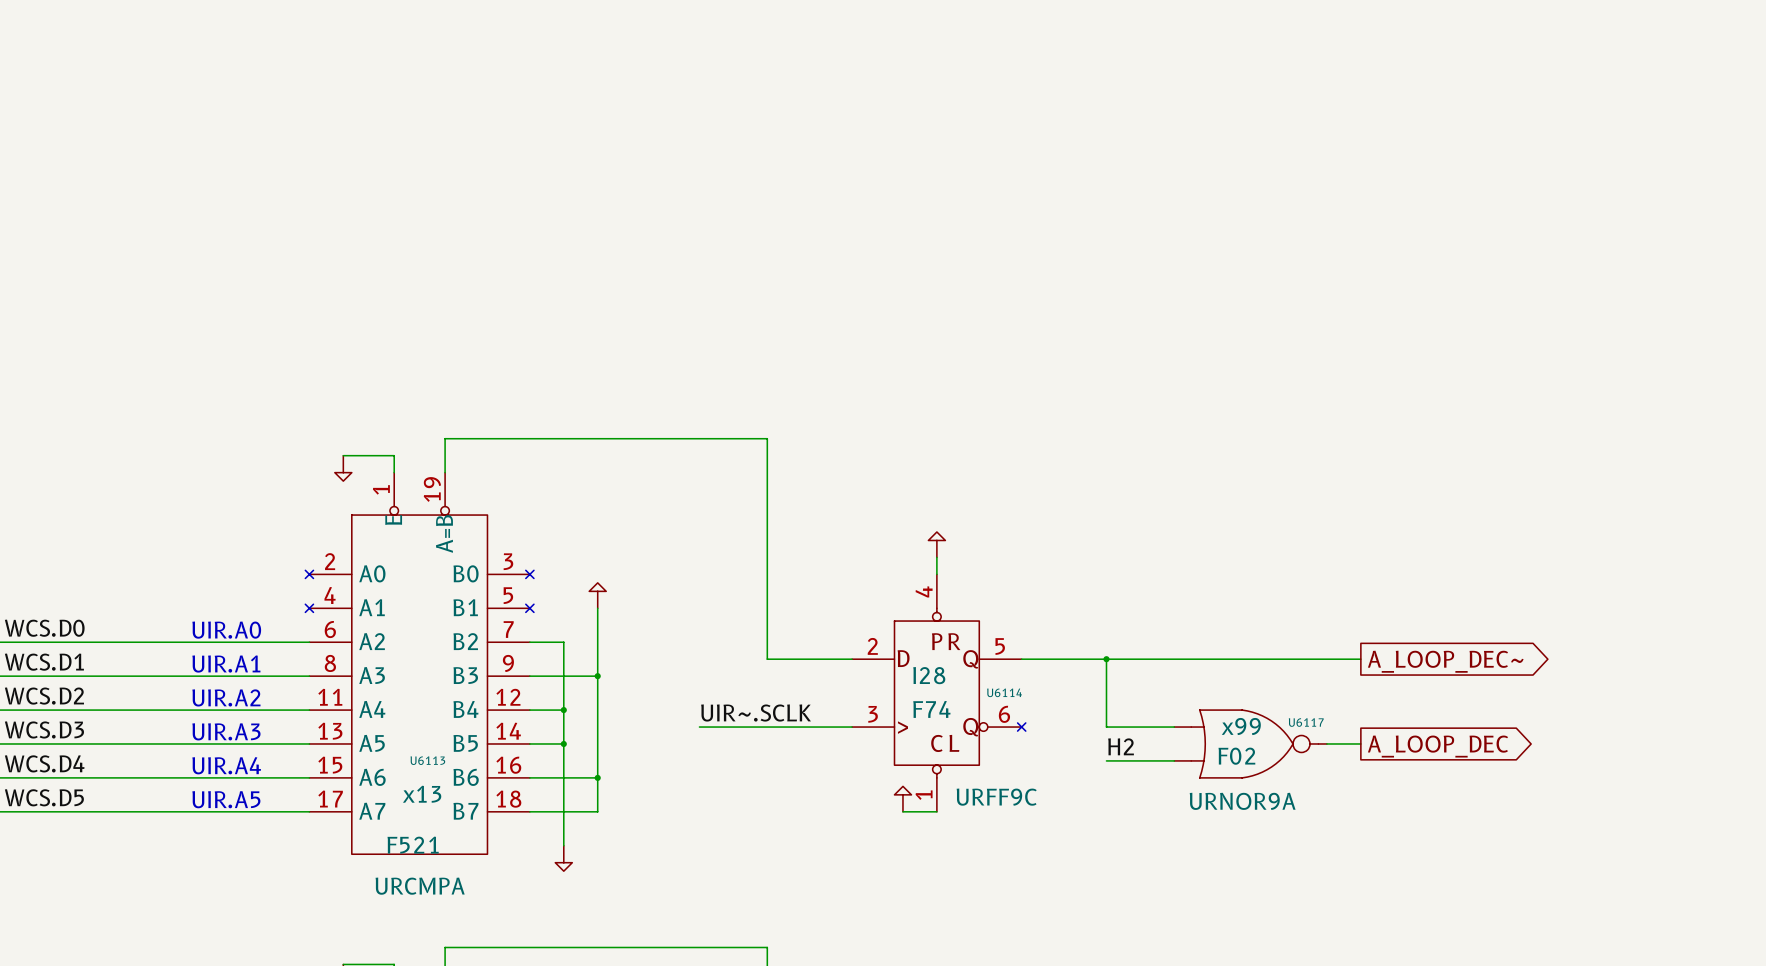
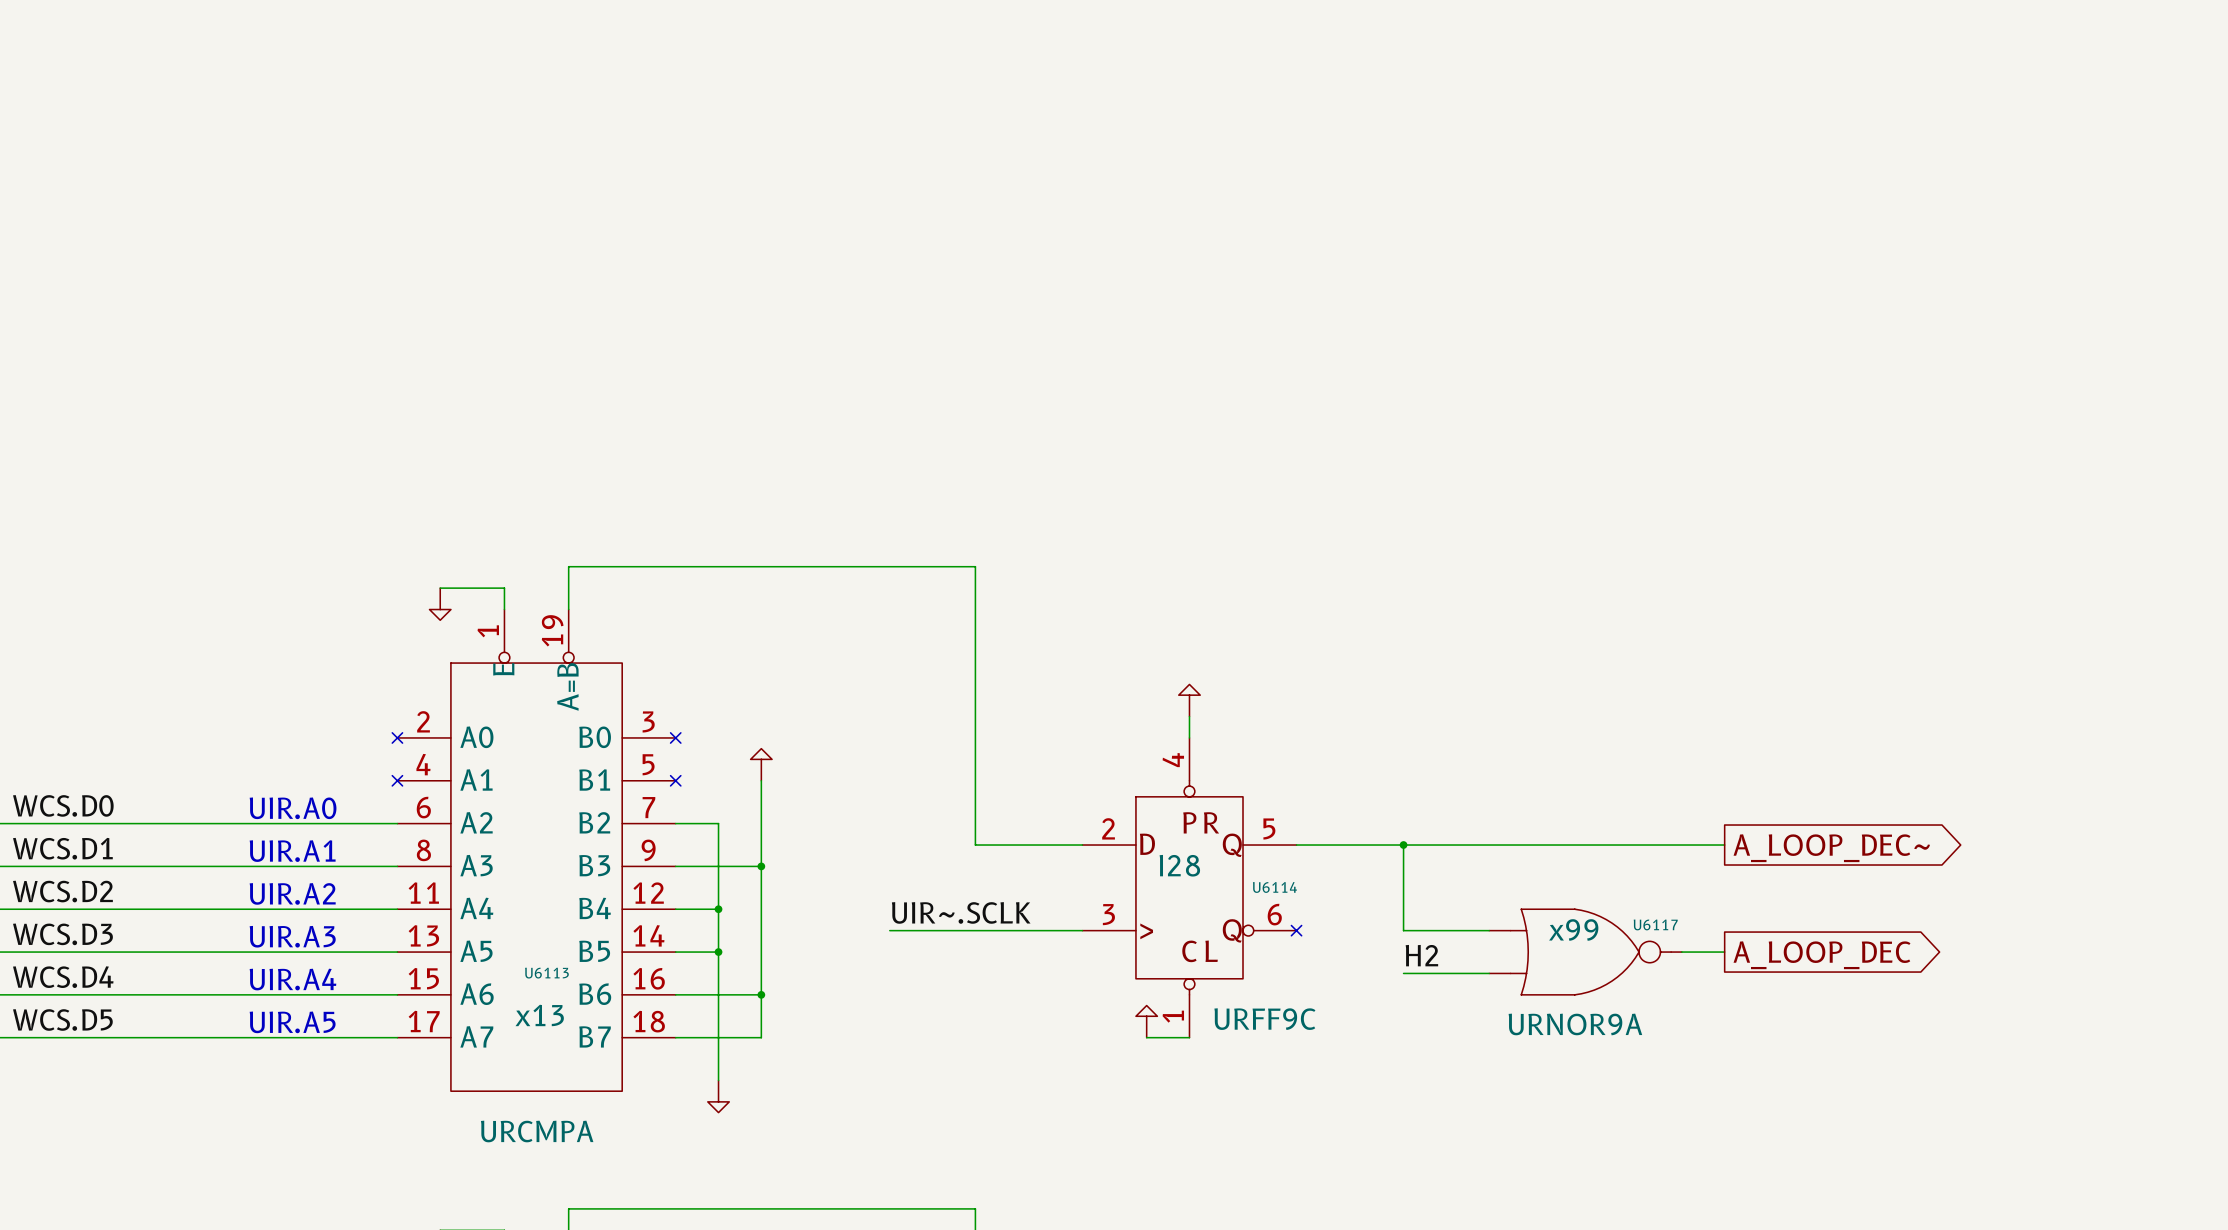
U6114 value: F74 (931, 709) -> none
U6117 value: F02 (1236, 756) -> none
U6113 value: F521 (413, 845) -> none

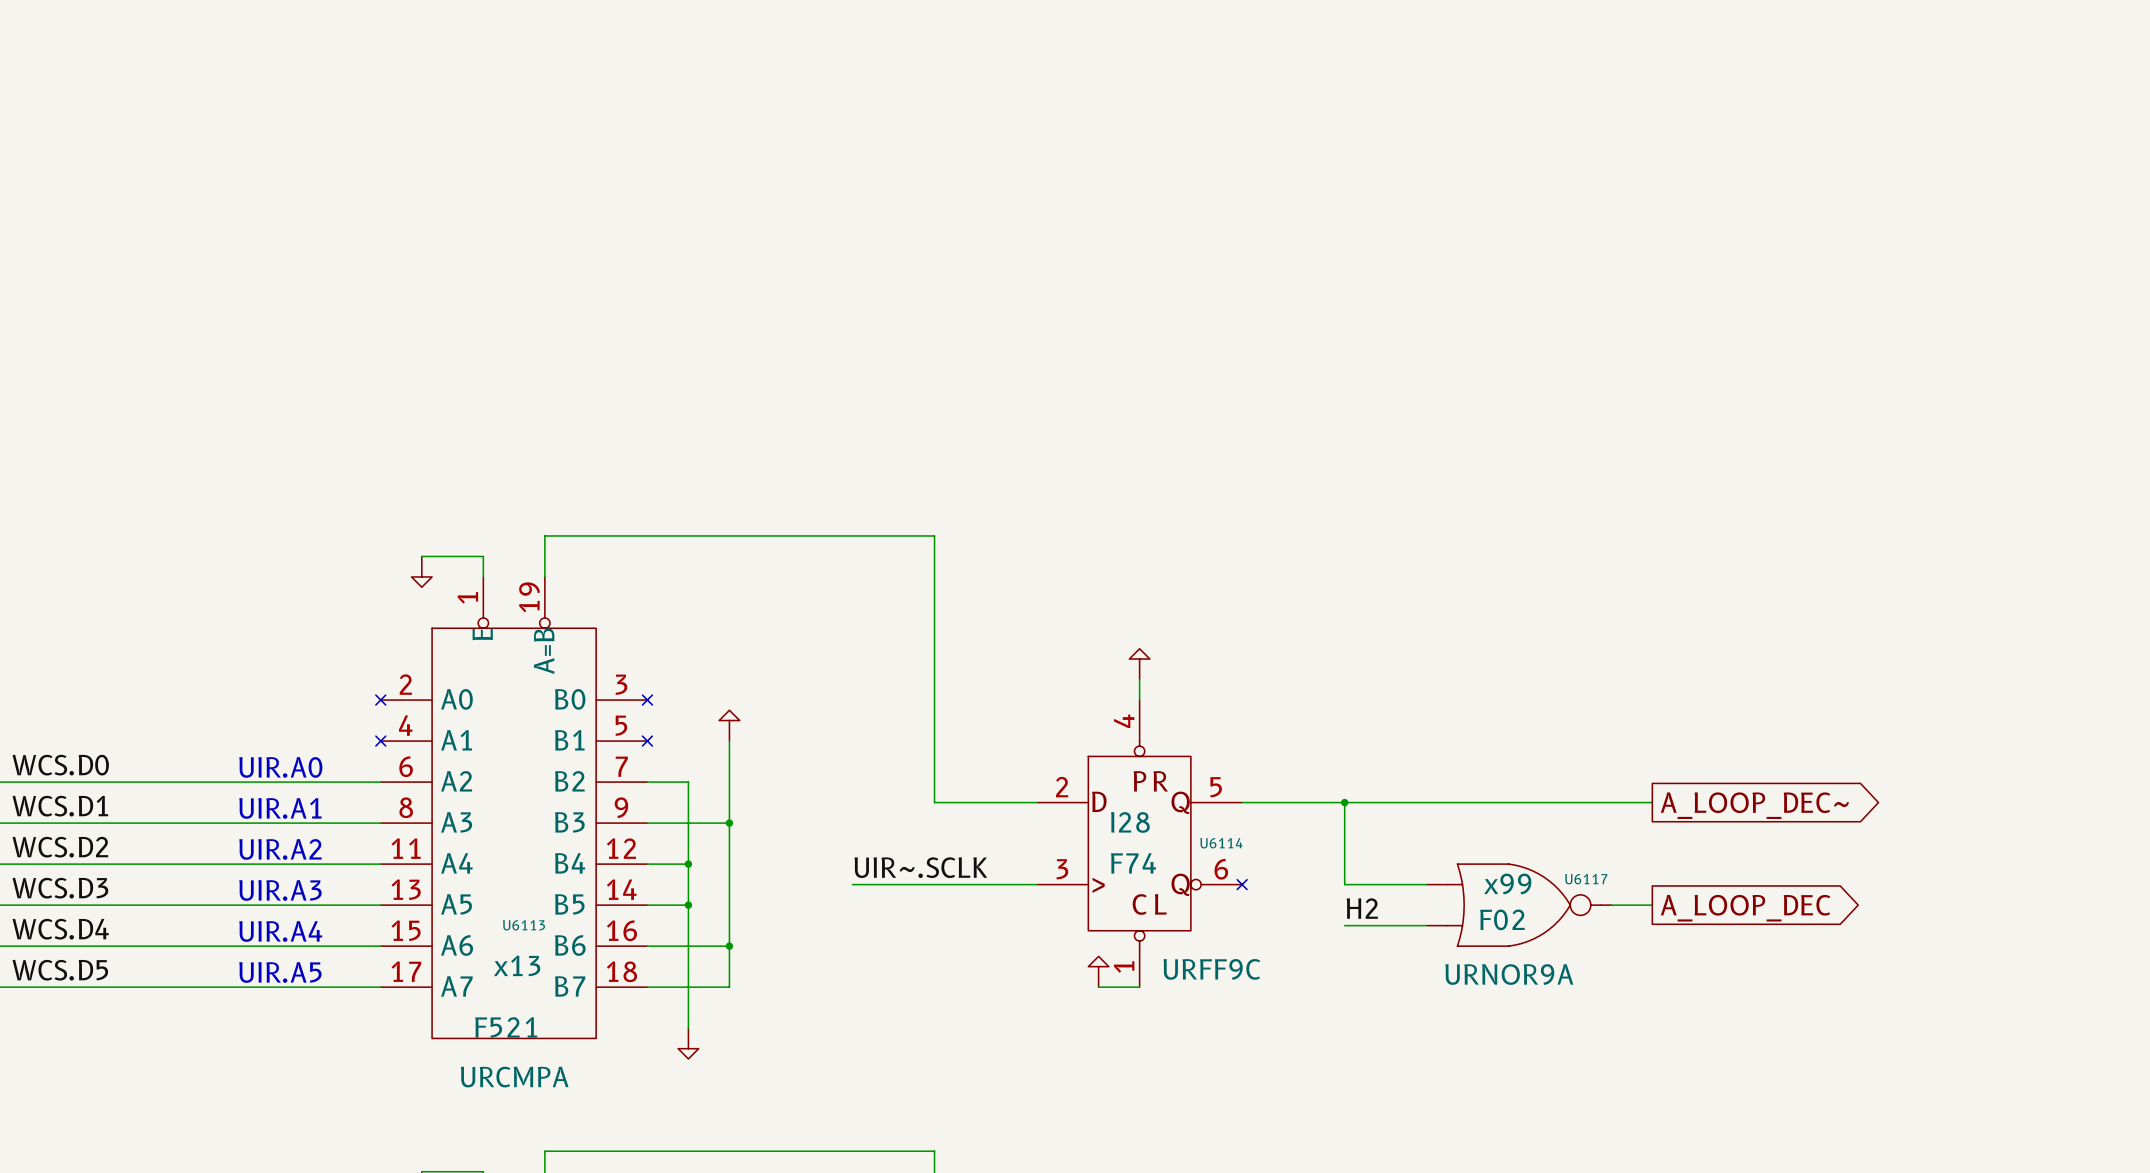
U6114 value: none -> F74 (1133, 863)
U6117 value: none -> F02 (1502, 919)
U6113 value: none -> F521 (506, 1027)

